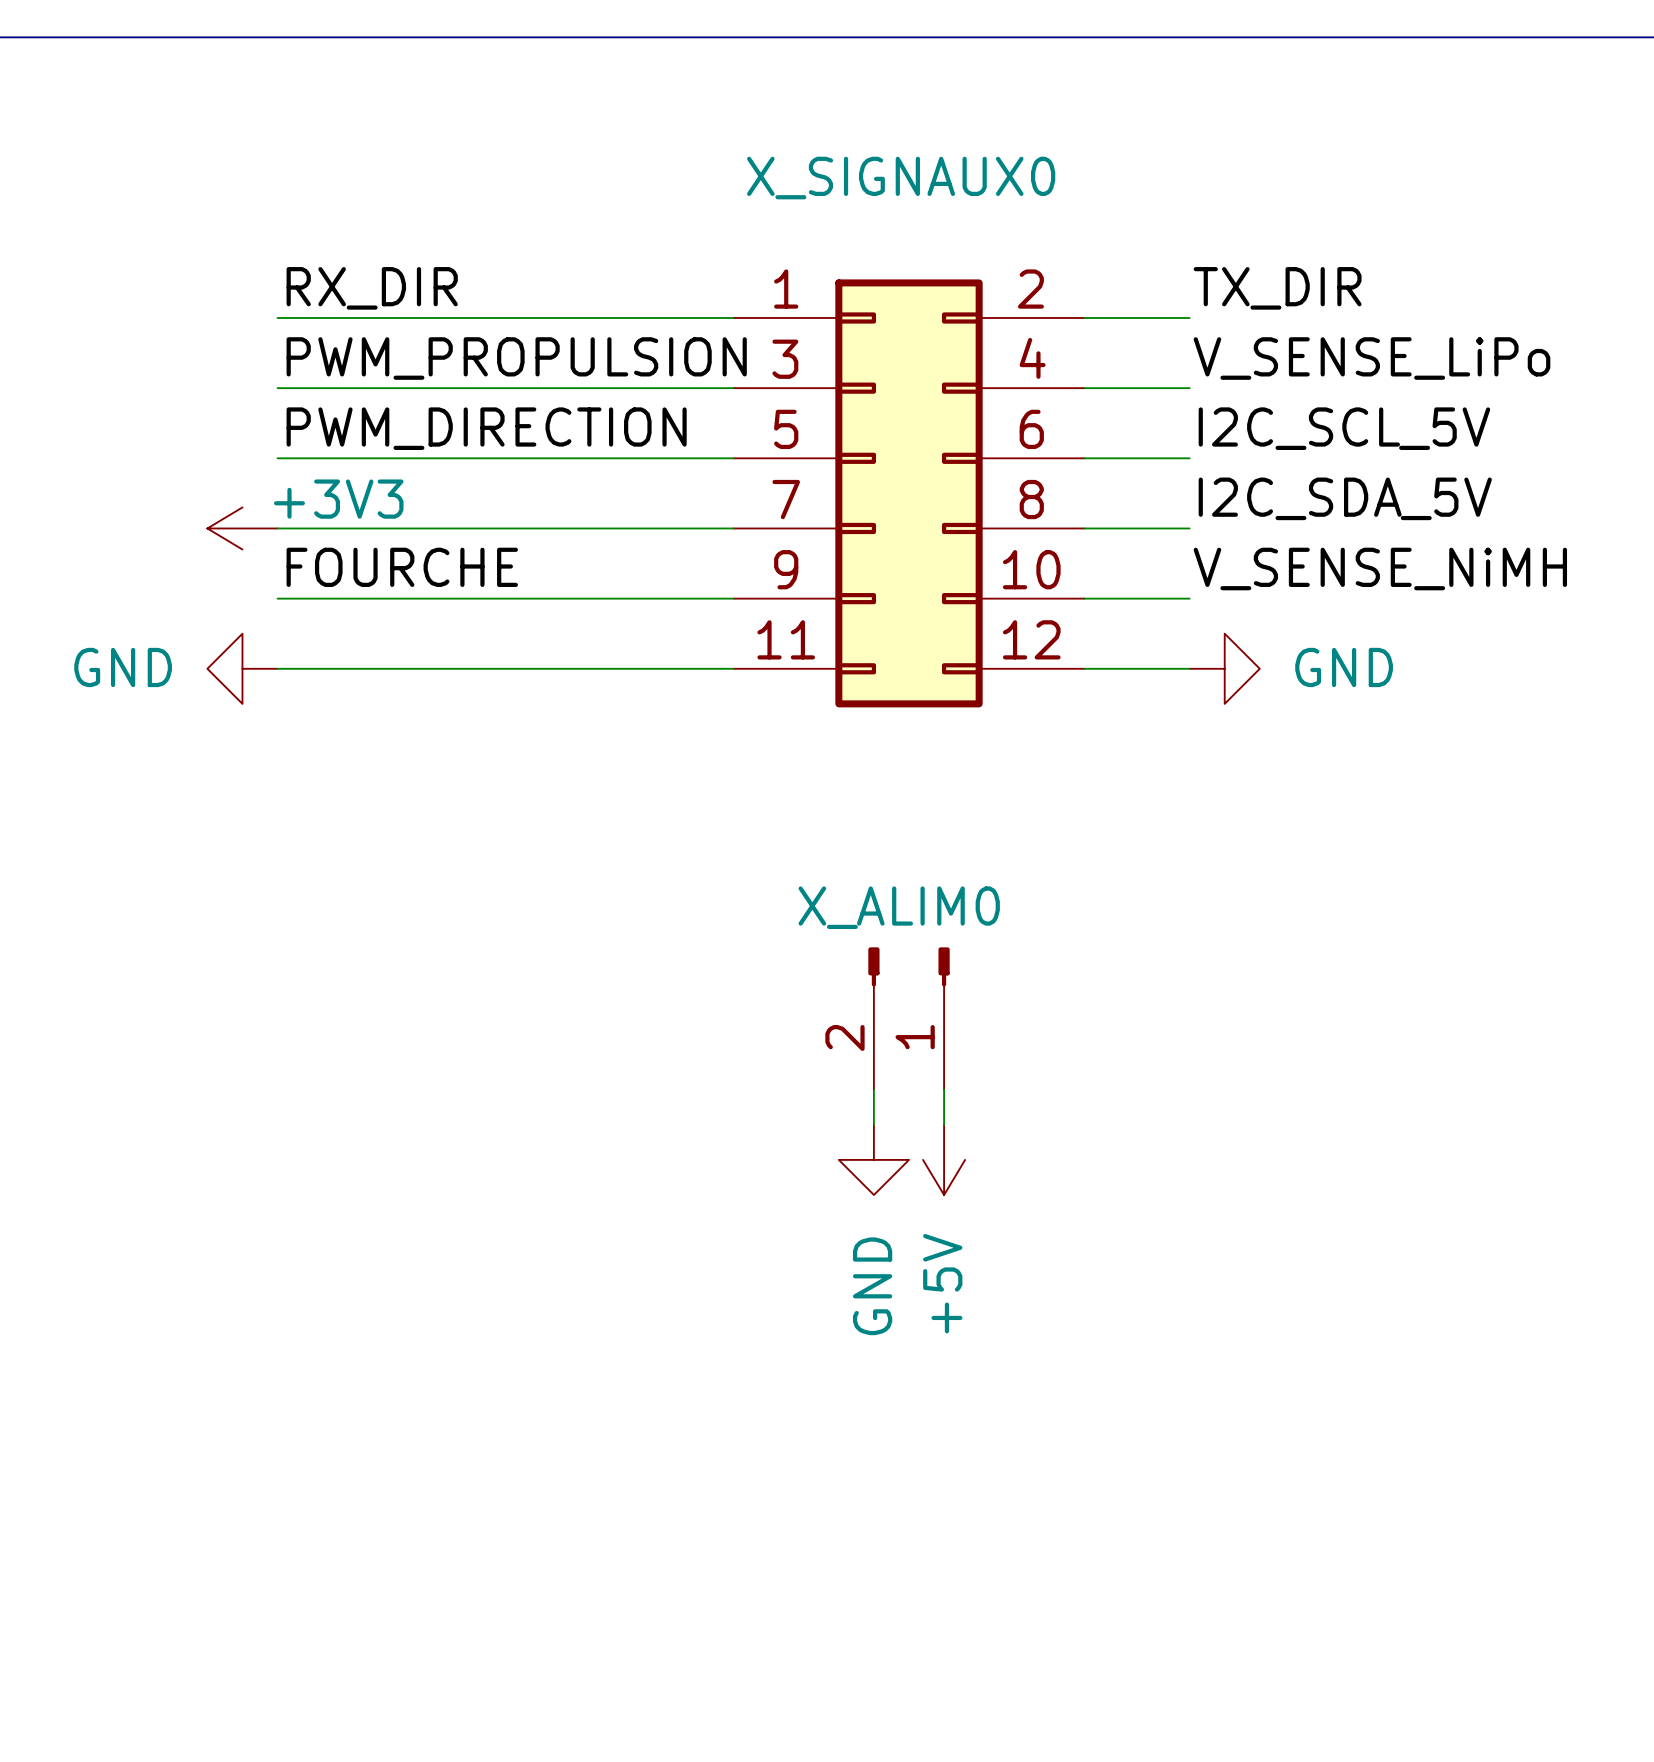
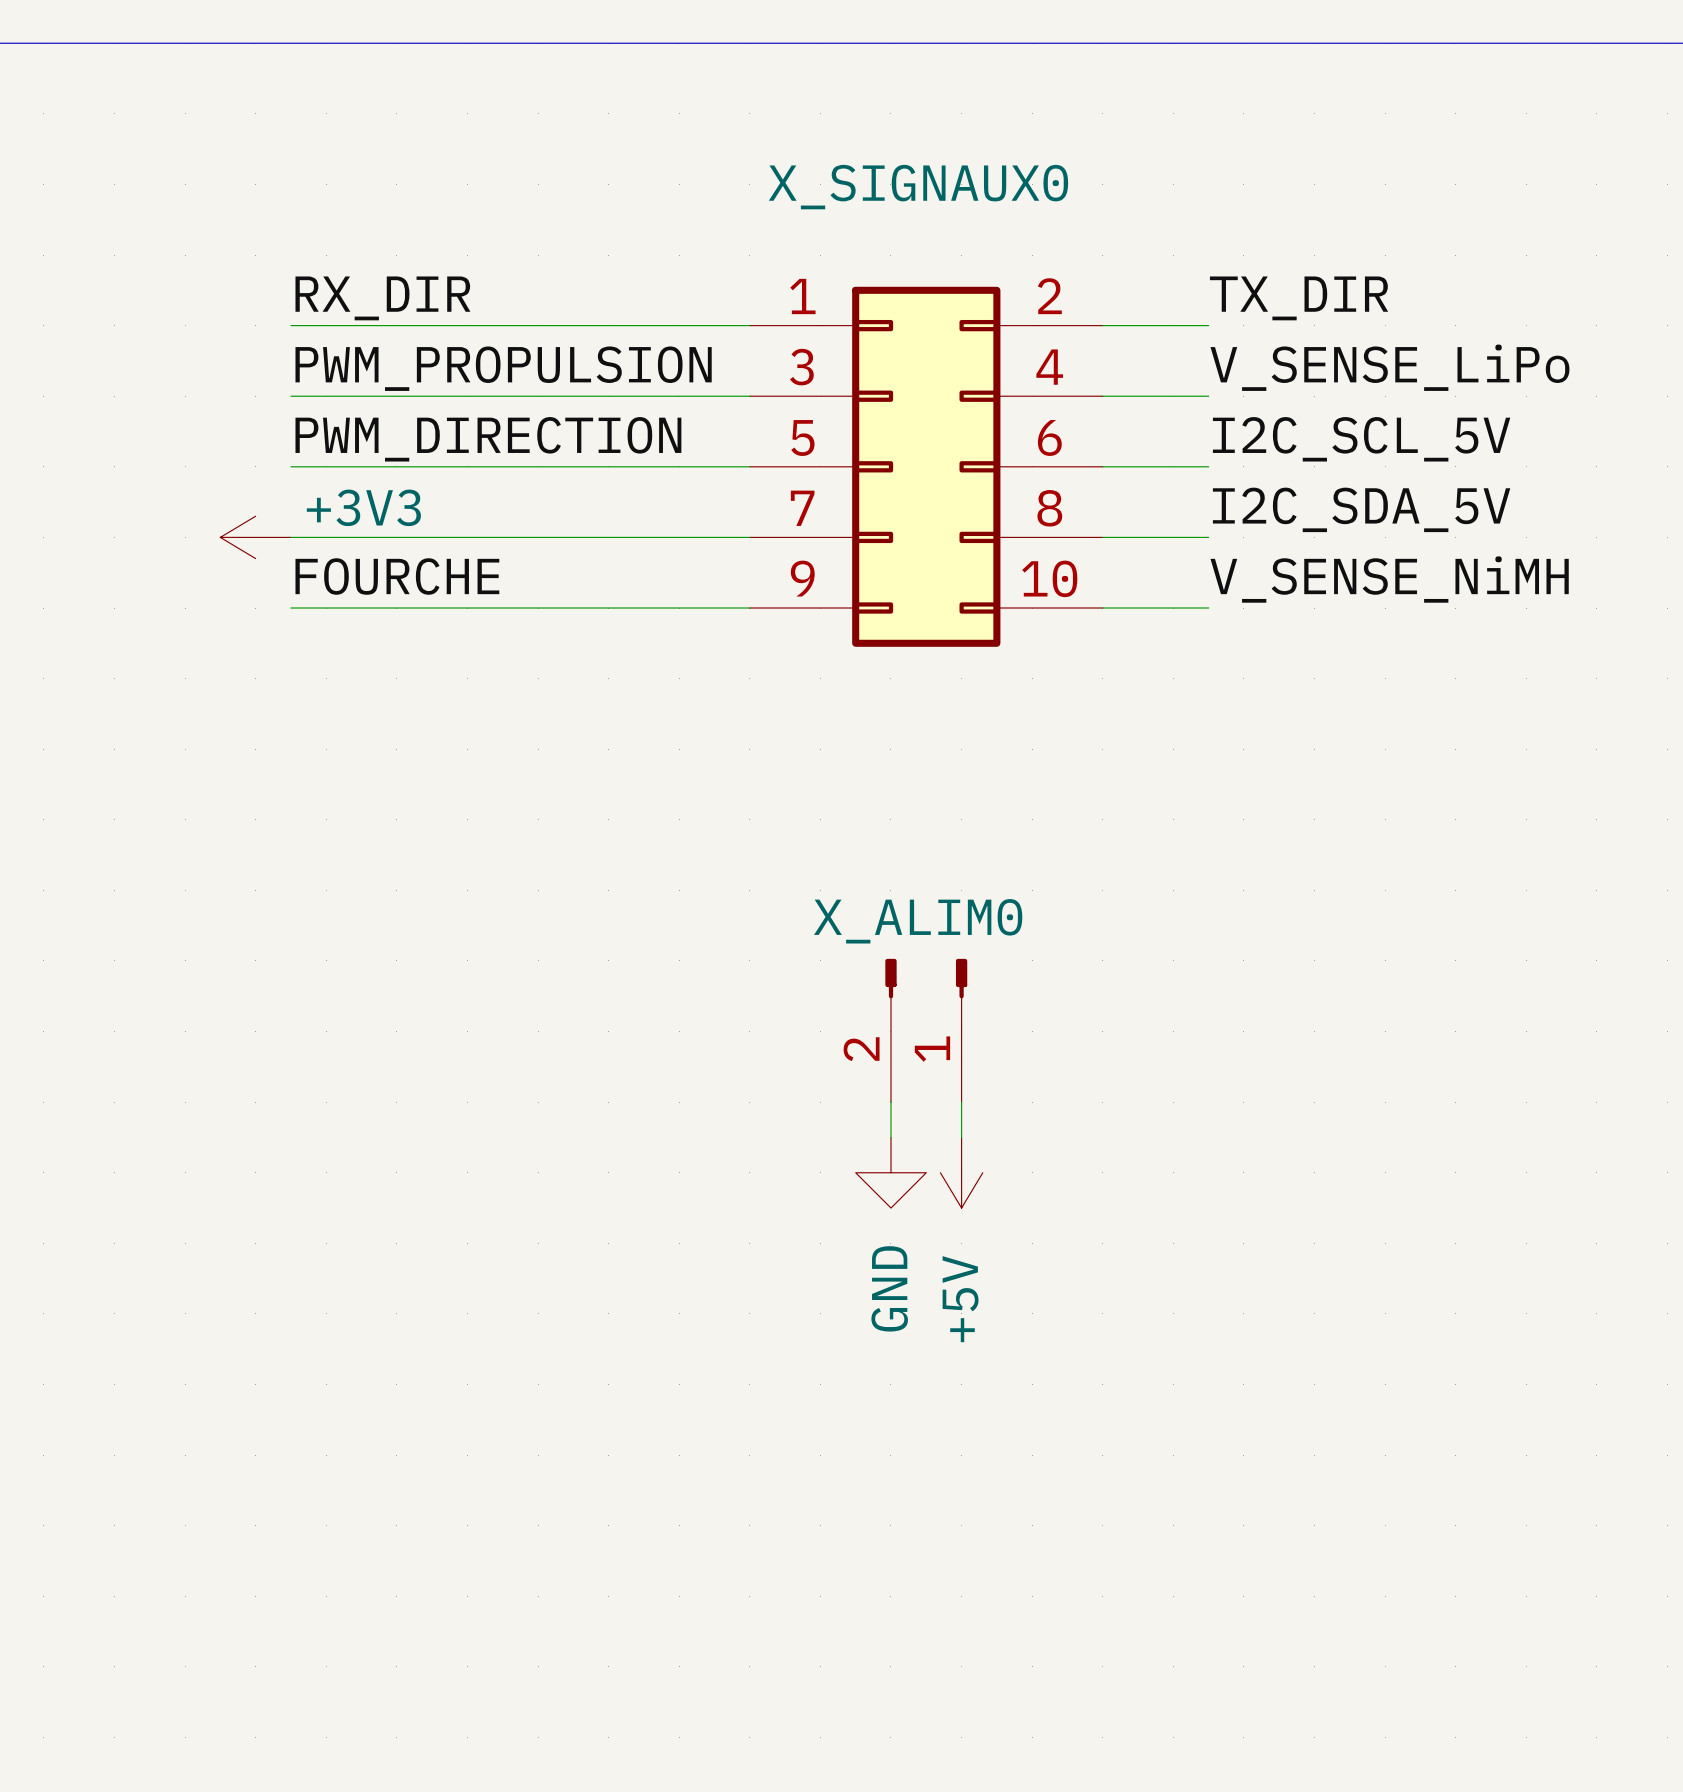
X_SIGNAUX0 symbol: [733, 279, 1085, 708] -> [749, 286, 1103, 647]
power symbol: GND (242, 668) -> none
wire: (277, 668) (733, 668) -> none
wire: (1084, 668) (1189, 668) -> none
power symbol: GND (1224, 668) -> none

